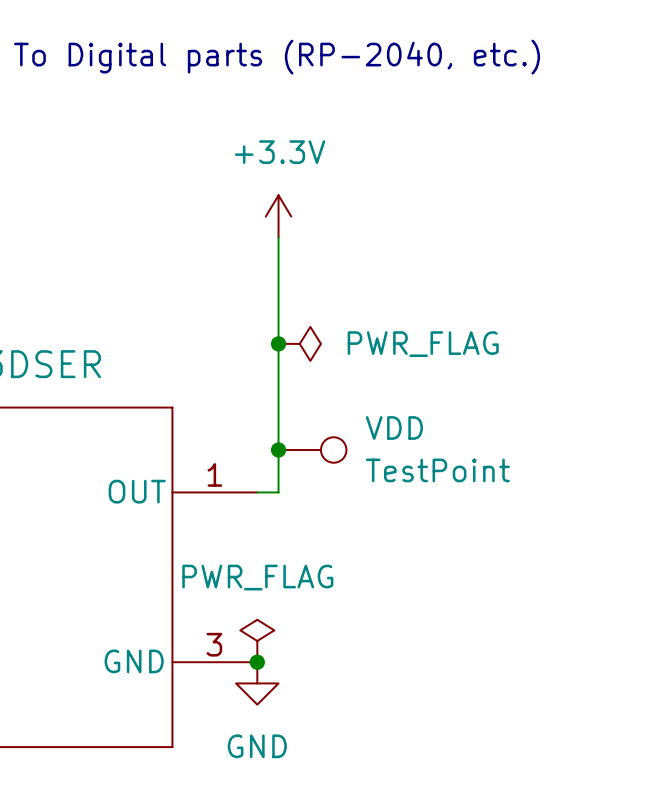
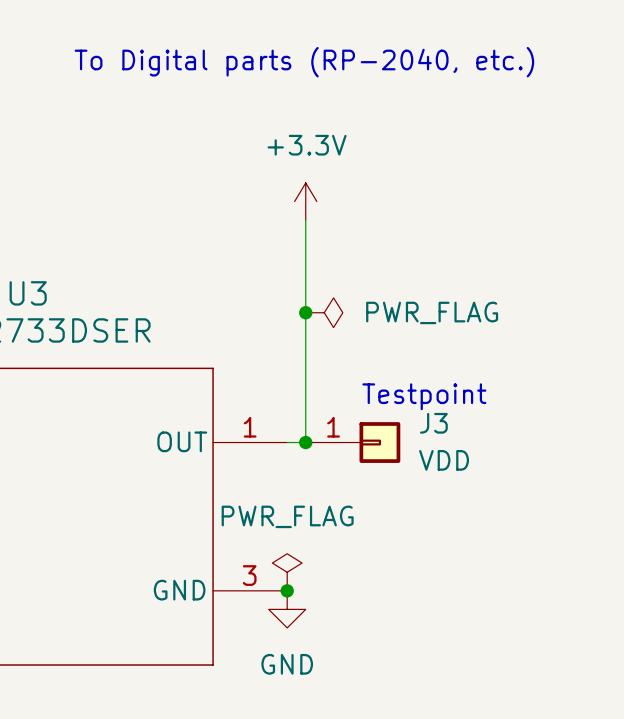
text: none -> Testpoint (424, 396)
junction position: (278, 450) -> (305, 442)
VDD: TestPoint (312, 450) -> none
J3: none -> VDD (353, 442)

